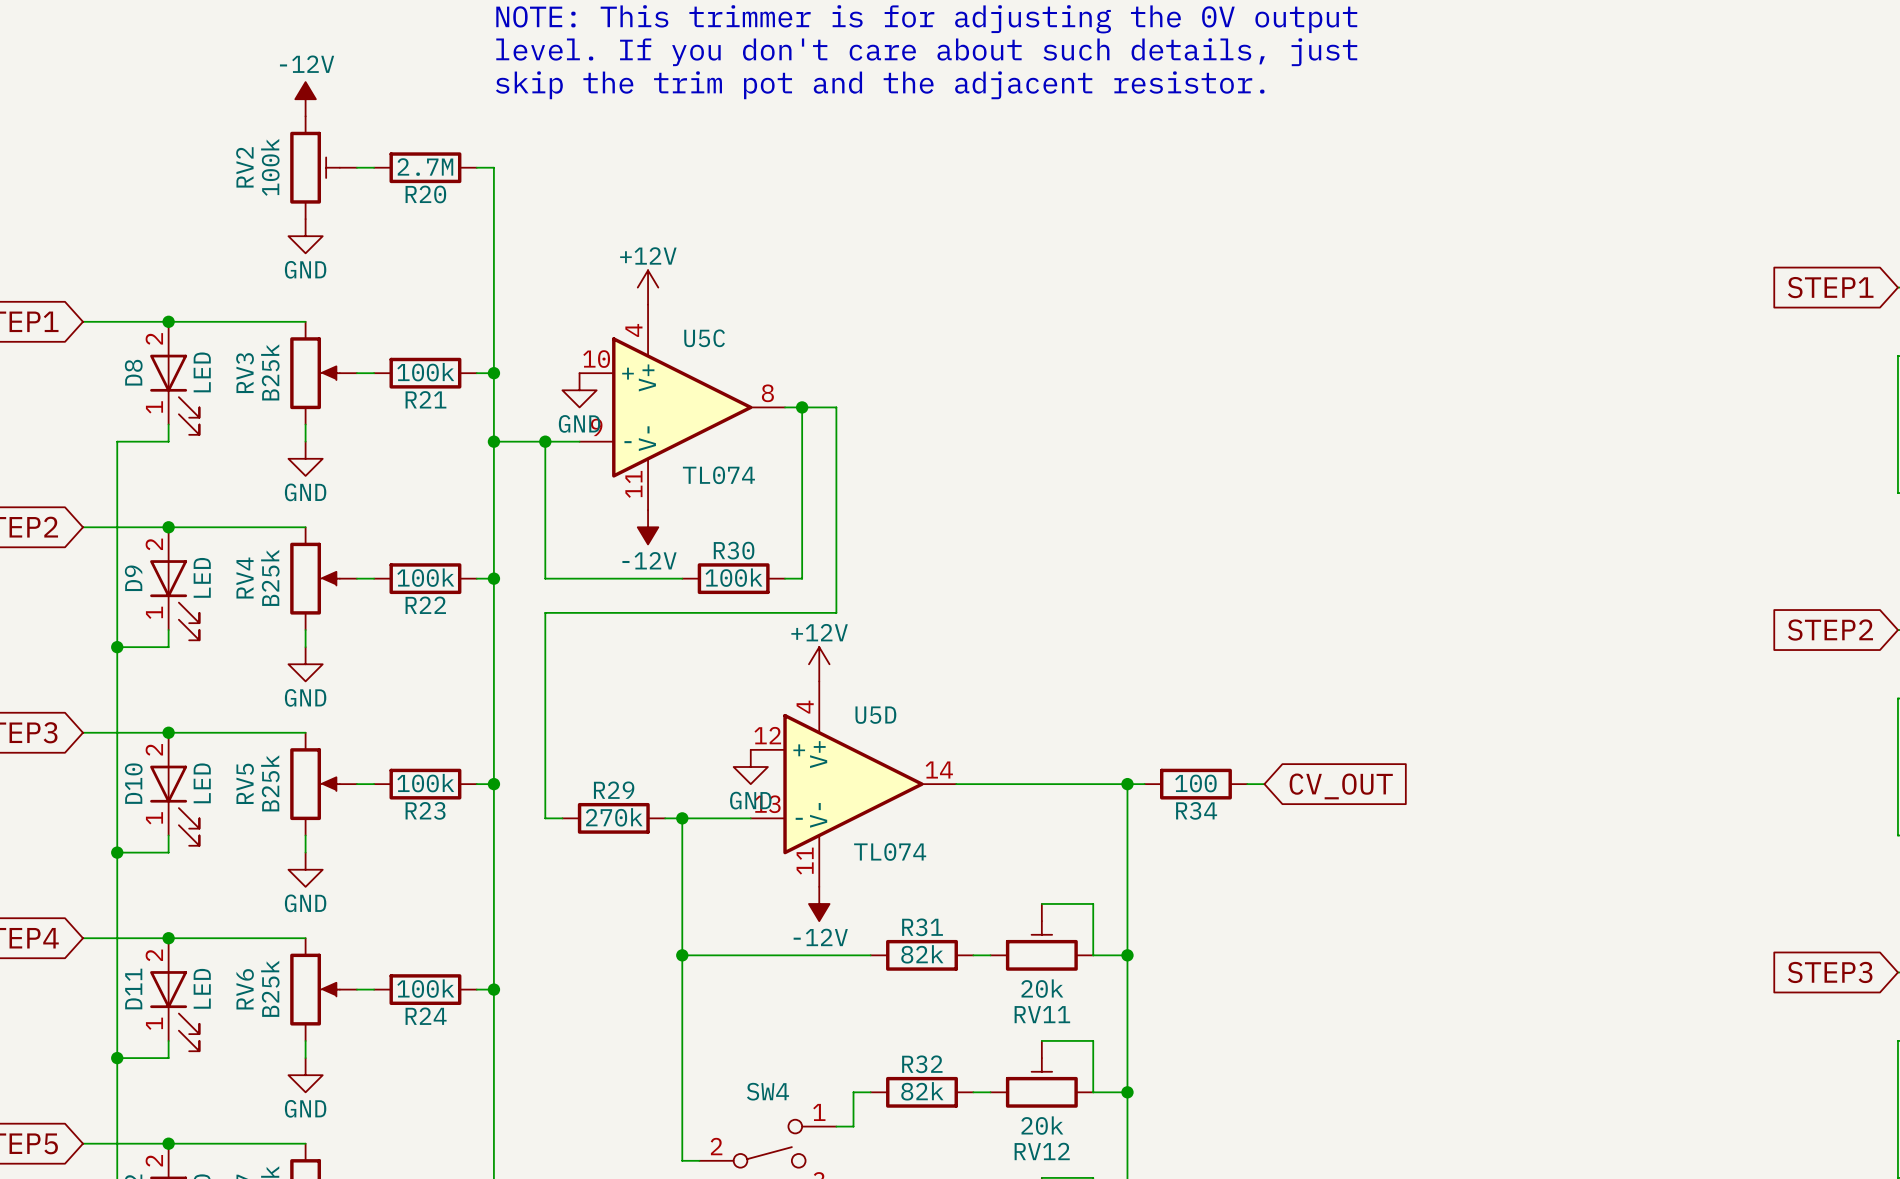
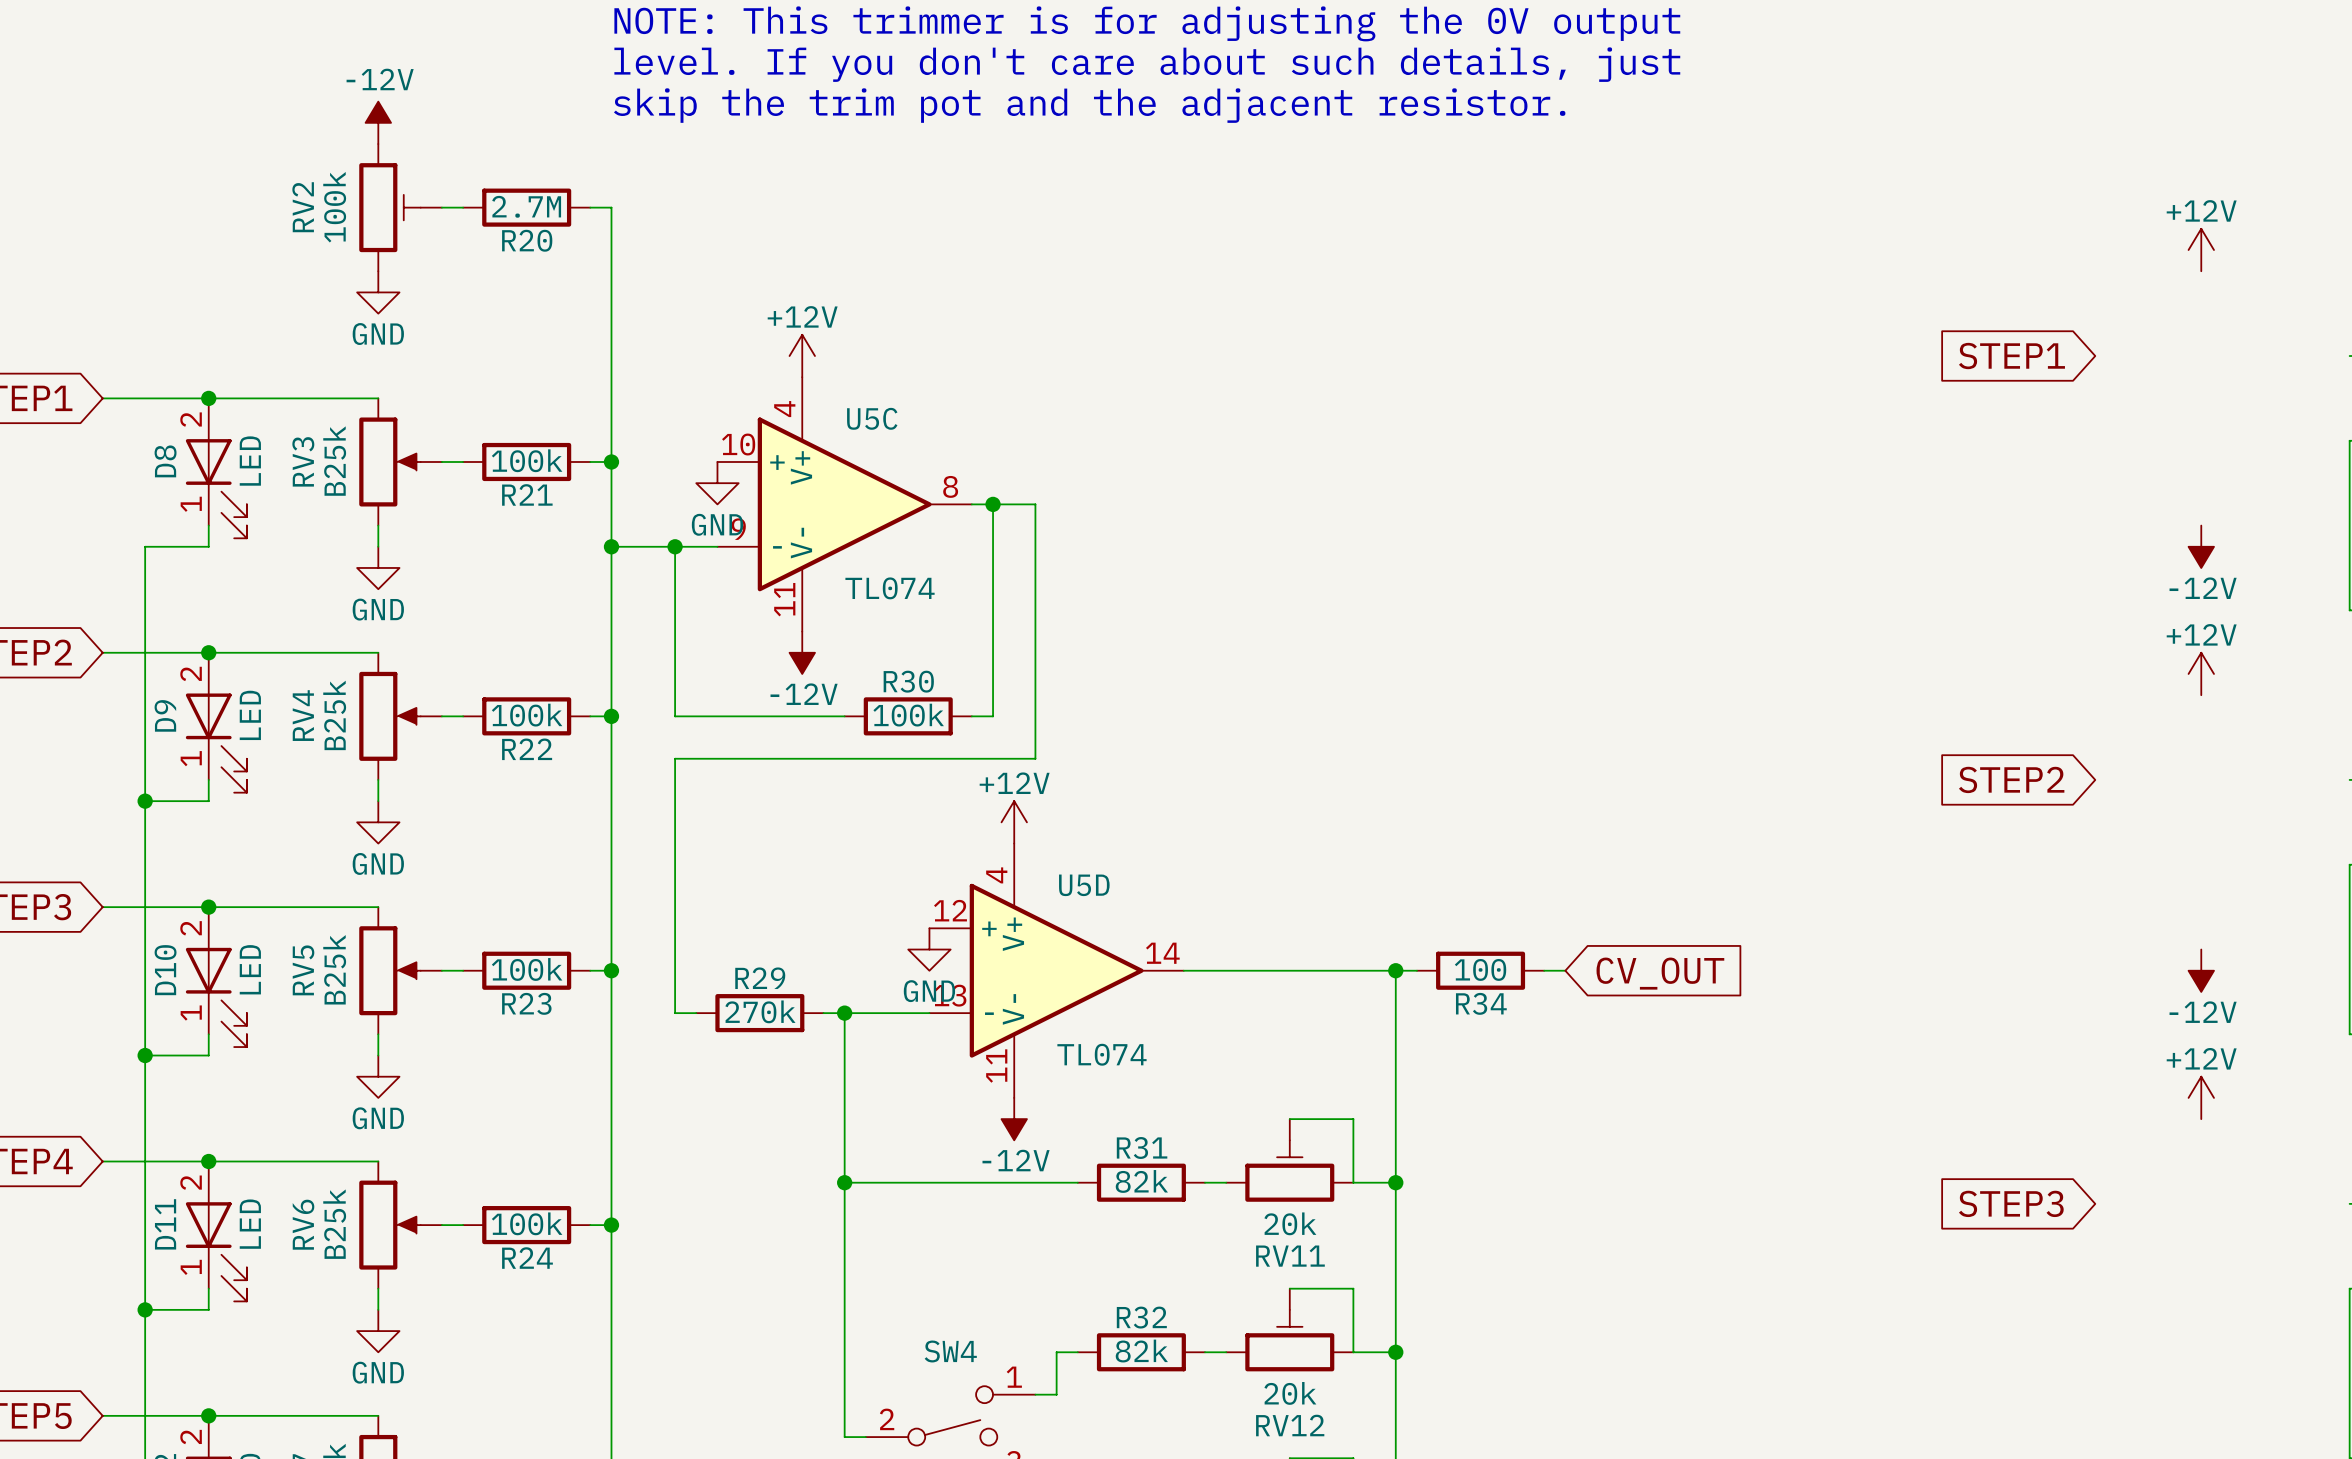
power symbol: none -> +12V (2201, 250)
global label position: STEP1 (1830, 287) -> STEP1 (2011, 356)
power symbol: none -> -12V (2201, 546)
power symbol: none -> +12V (2201, 673)
global label position: STEP2 (1830, 630) -> STEP2 (2011, 779)
power symbol: none -> -12V (2201, 970)
power symbol: none -> +12V (2201, 1097)
global label position: STEP3 (1830, 972) -> STEP3 (2011, 1203)

